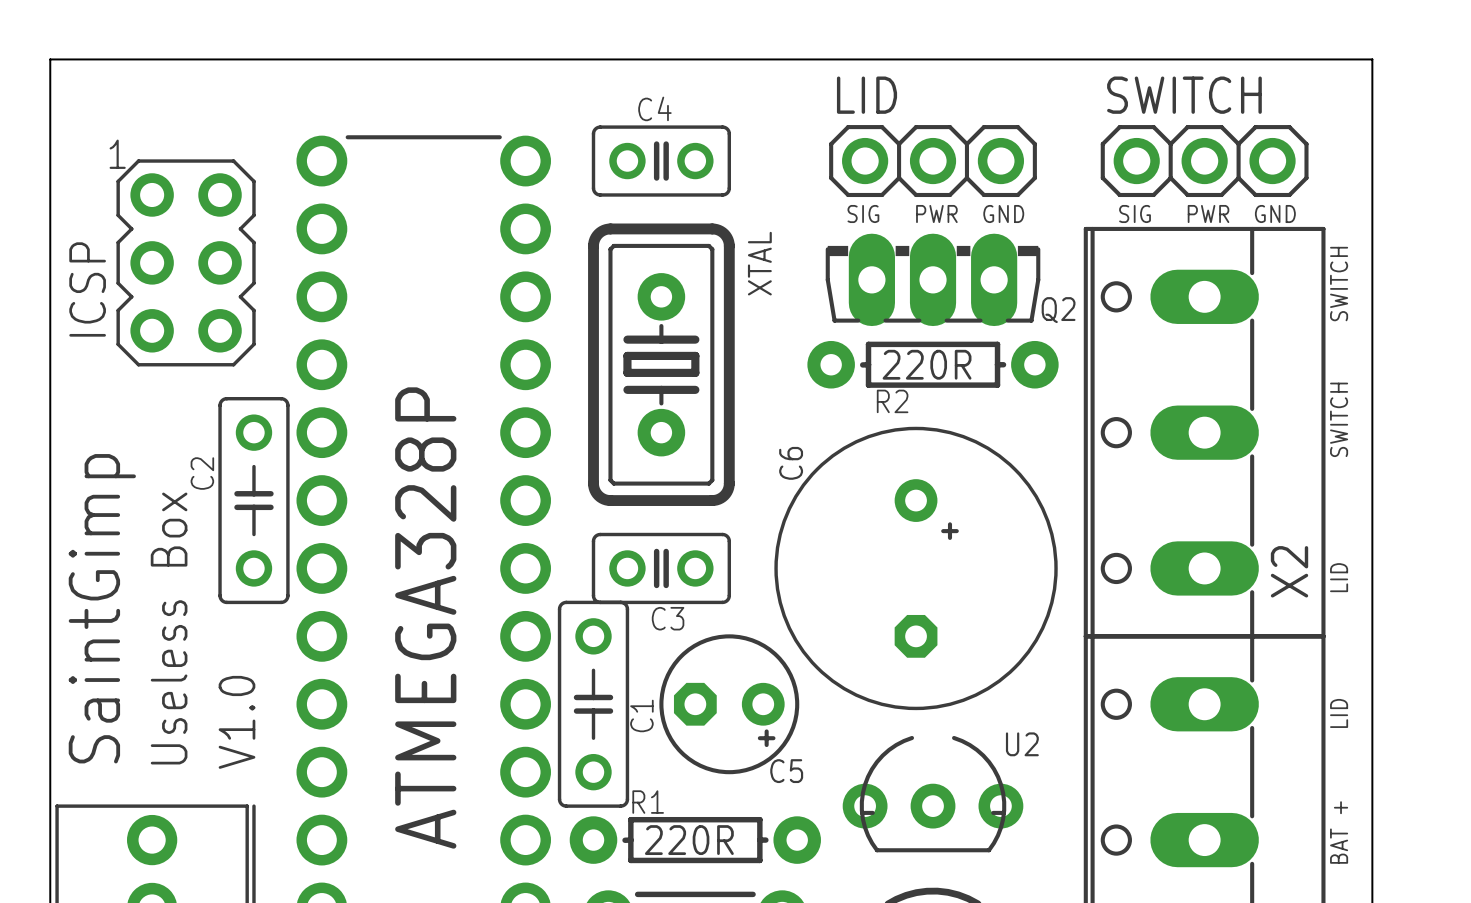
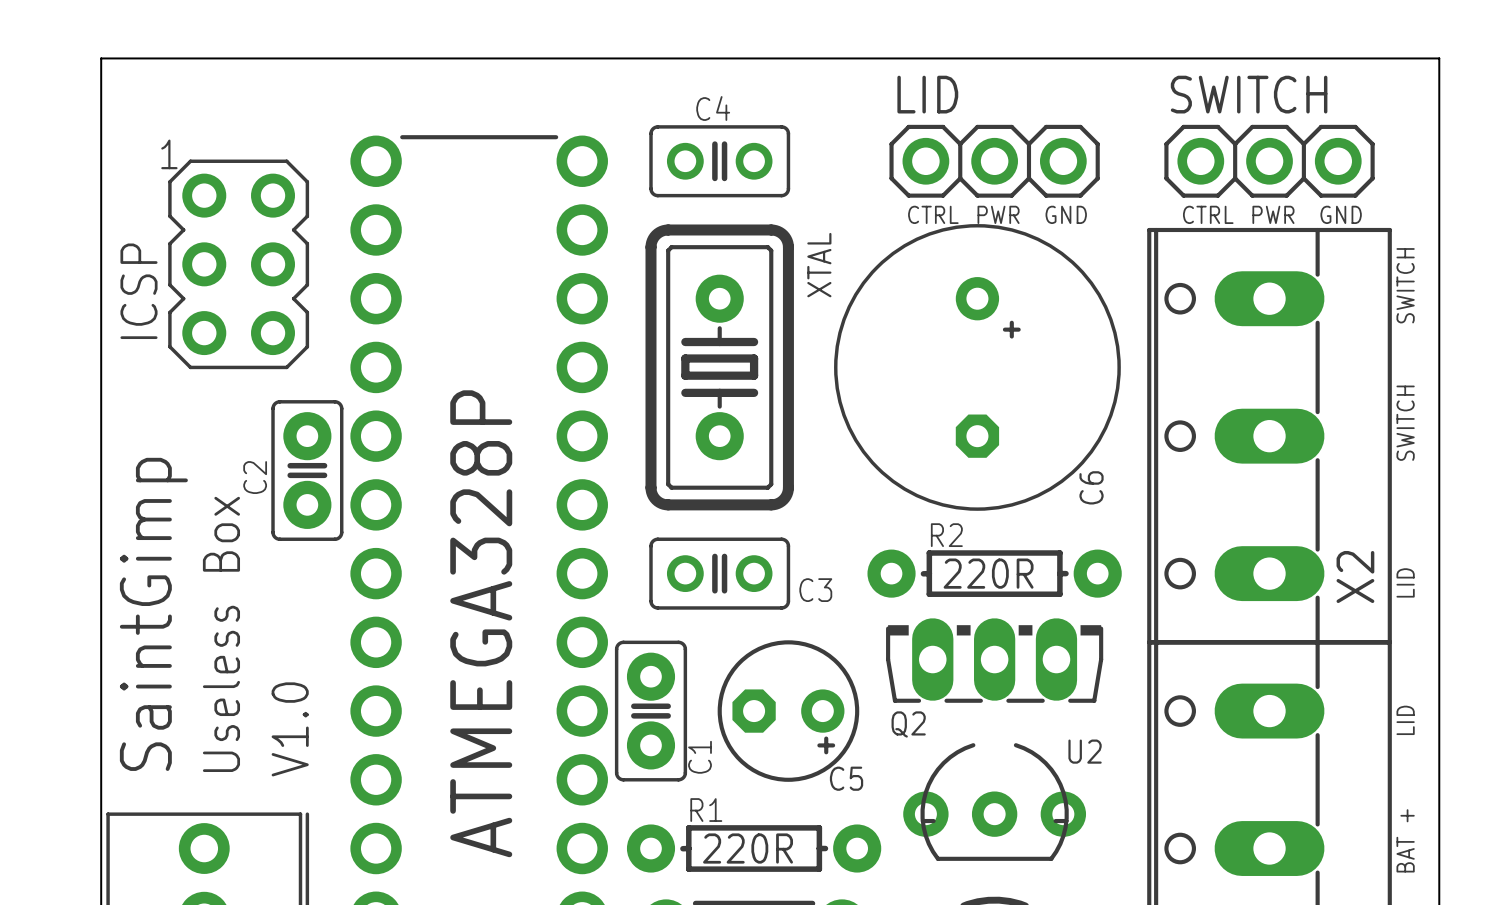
text: SIG (863, 214) -> CTRL (933, 214)
text: SIG (1135, 214) -> CTRL (1208, 214)
Q2 footprint: [825, 233, 1041, 327] -> [886, 618, 1104, 703]
Q2 name position: Q2 (1058, 310) -> Q2 (908, 724)
R2 position: (933, 364) -> (994, 573)
C2 footprint: [218, 397, 290, 605] -> [271, 400, 344, 541]
R2 name position: R2 (892, 401) -> R2 (946, 535)
C6 name position: C6 (791, 463) -> C6 (1091, 487)
C6 position: (916, 568) -> (977, 367)
C1 footprint: [557, 600, 630, 808] -> [614, 640, 688, 782]
C3 name position: C3 (668, 618) -> C3 (815, 590)

